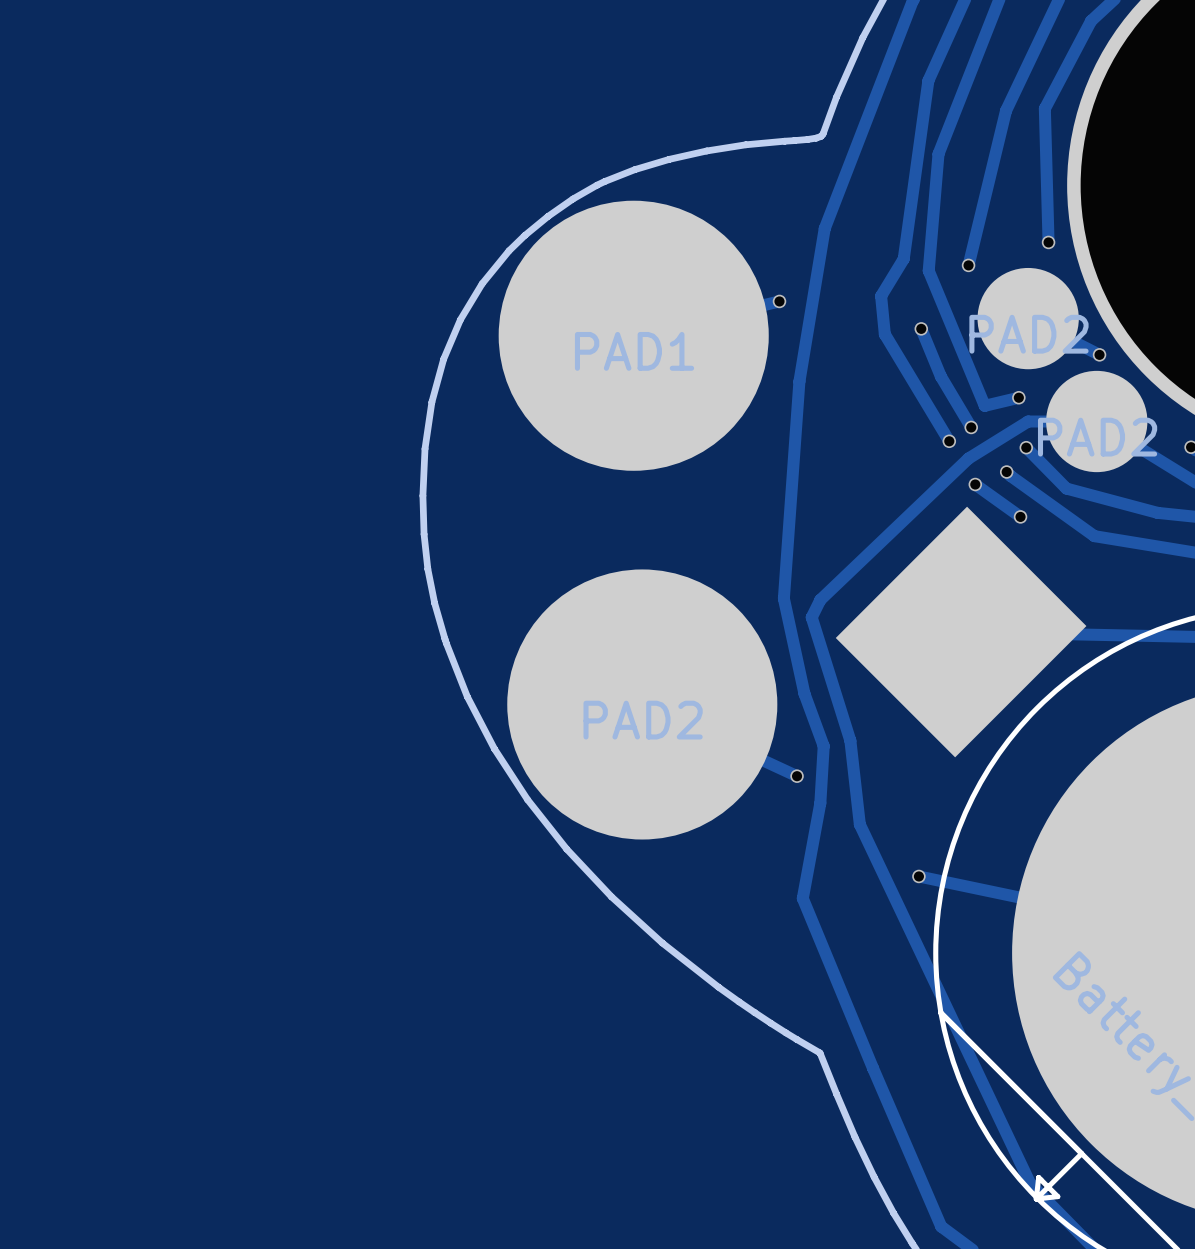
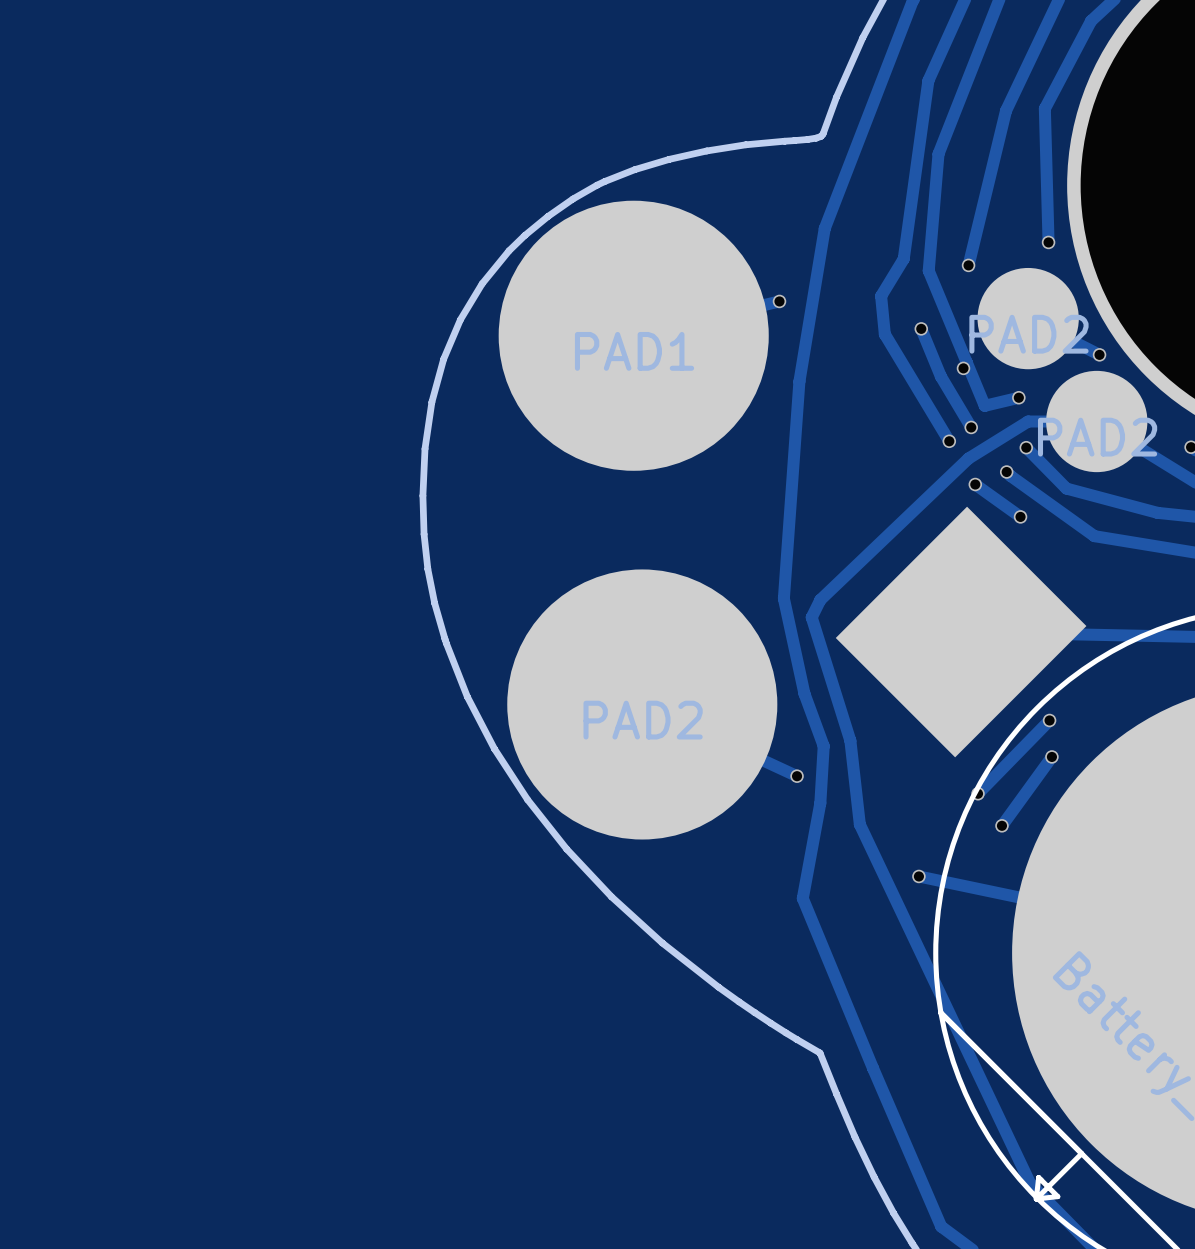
via: none -> (963, 368)
track: none -> (1049, 720) (978, 793)
via: none -> (1049, 720)
track: none -> (1051, 756) (1001, 825)
via: none -> (1051, 756)
via: none -> (978, 793)
via: none -> (1001, 825)

